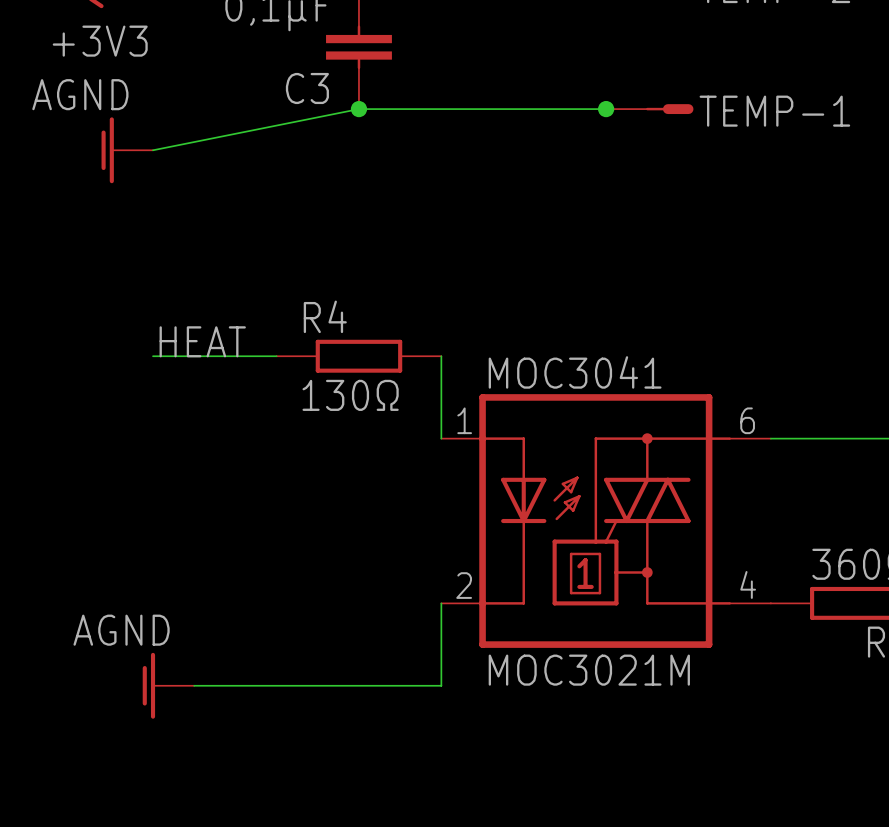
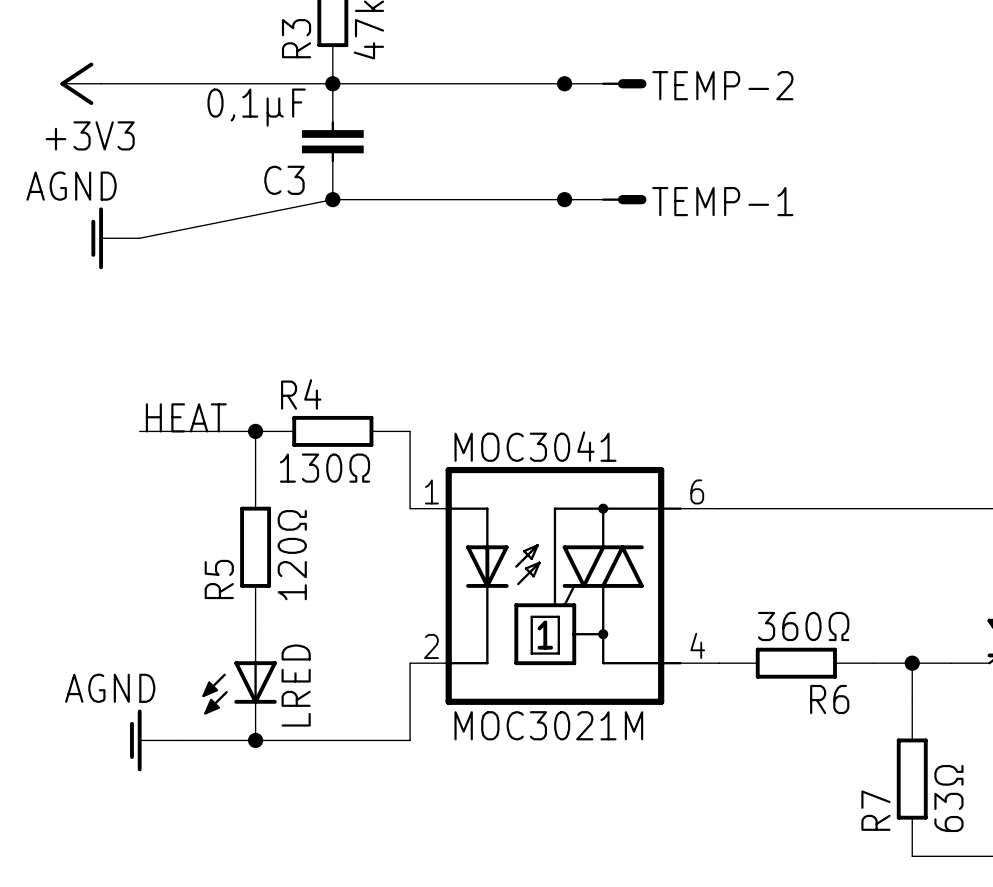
wire: none -> (255, 431) (255, 470)
junction: none -> (255, 431)
R5: none -> 120Ω (255, 547)
LRED: none -> (239, 682)
junction: none -> (255, 740)

